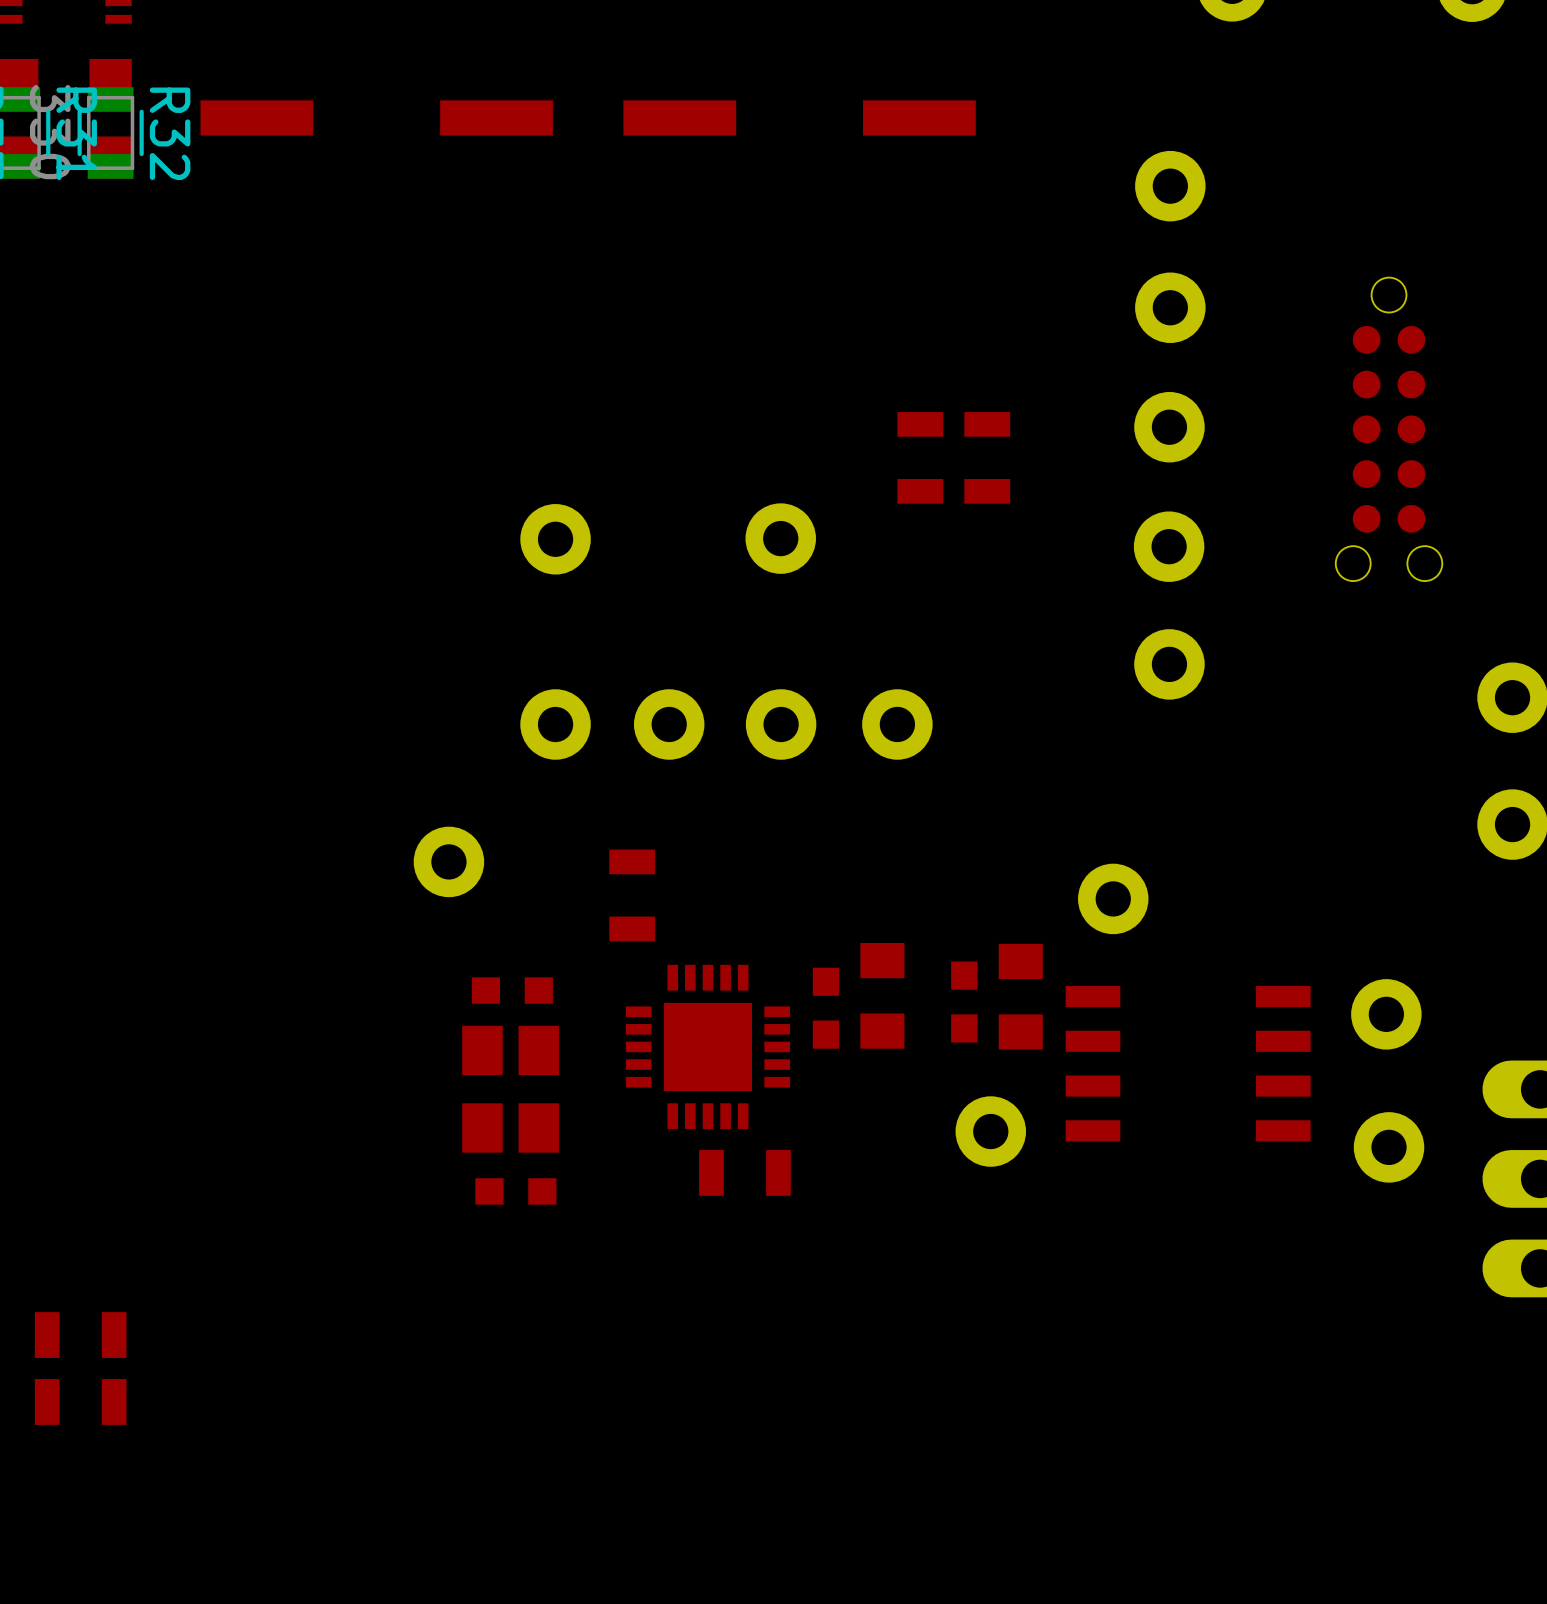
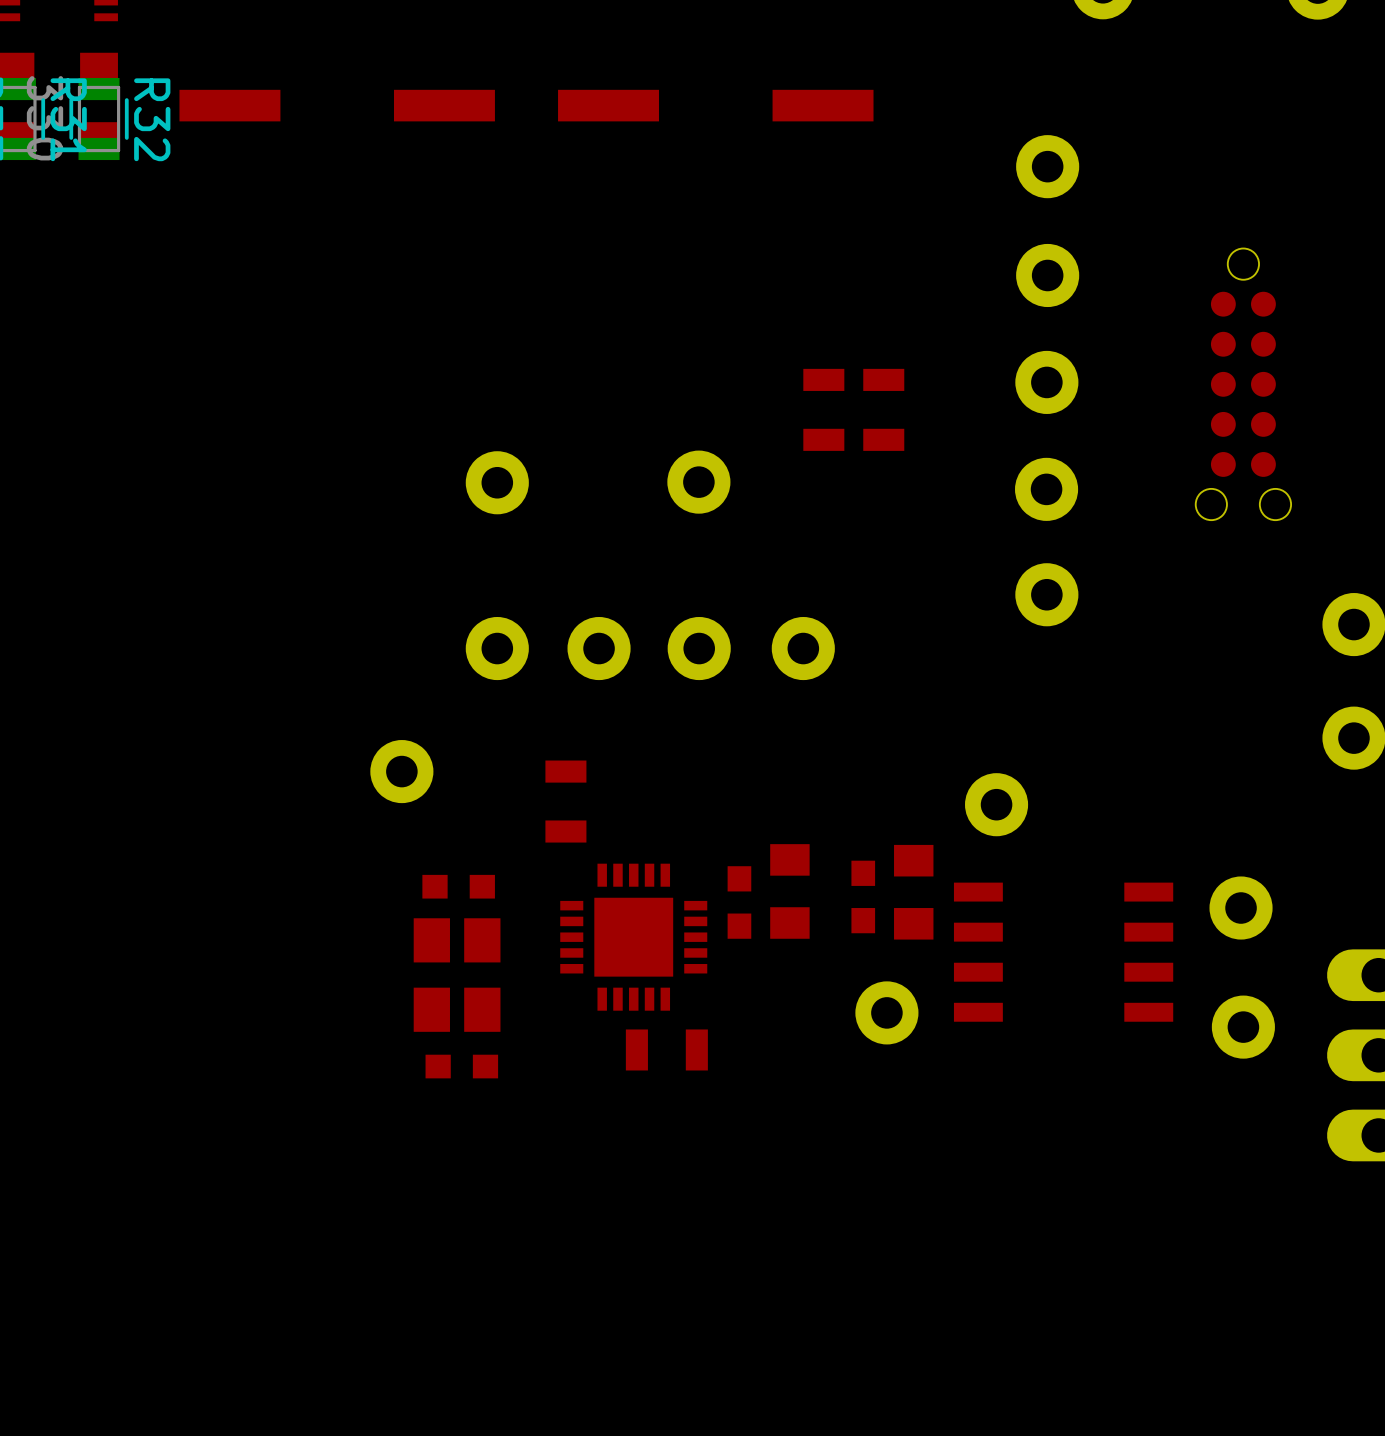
part: (80, 1335) -> none
part: (80, 1402) -> none

